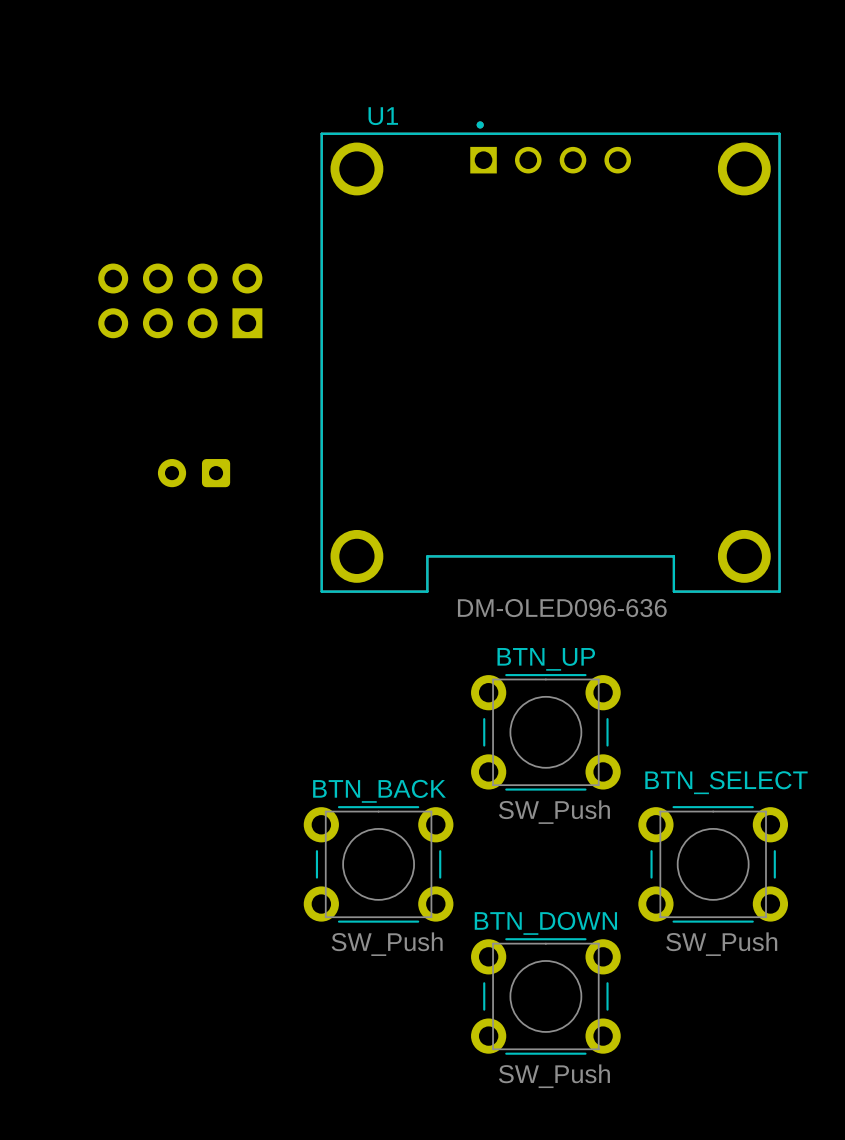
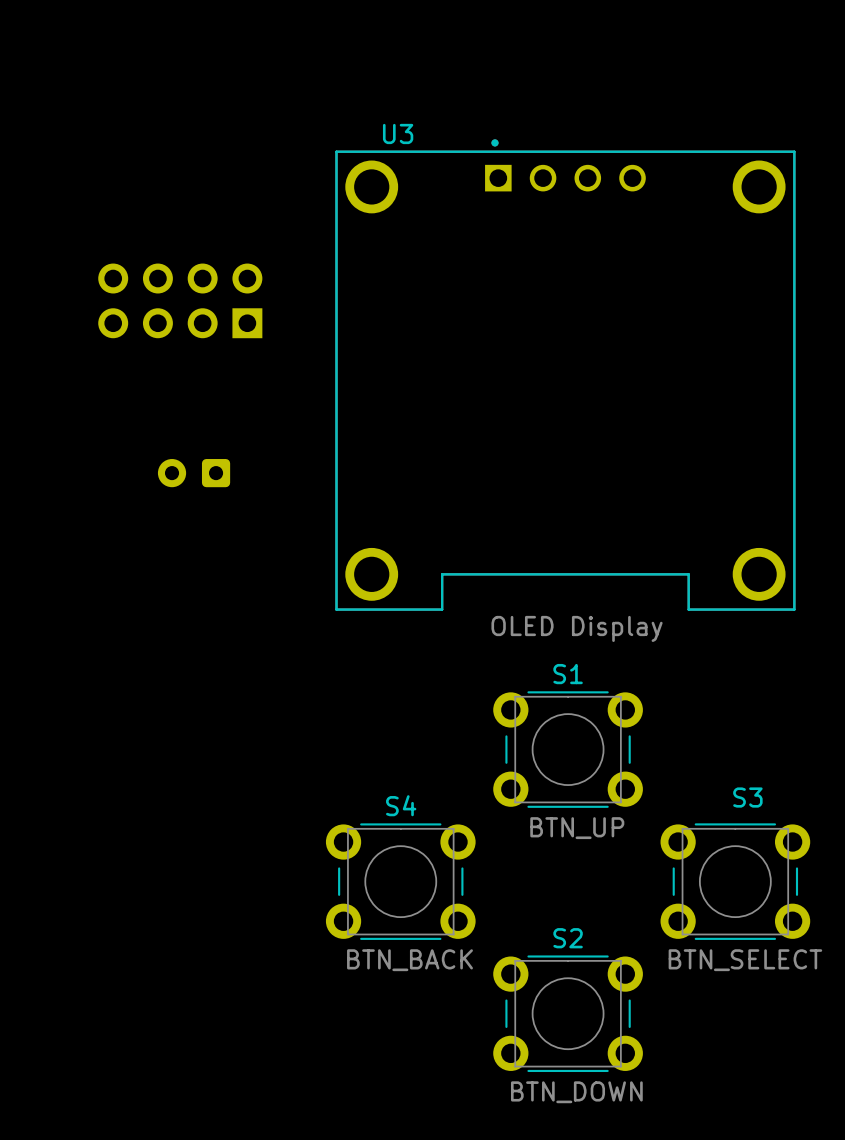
U1: DM-OLED096-636 (550, 357) -> none
U3: none -> OLED Display (565, 375)
BTN_UP: SW_Push (545, 732) -> none
S1: none -> BTN_UP (568, 749)
BTN_BACK: SW_Push (378, 864) -> none
BTN_SELECT: SW_Push (713, 864) -> none
S4: none -> BTN_BACK (400, 881)
S3: none -> BTN_SELECT (735, 881)
BTN_DOWN: SW_Push (545, 996) -> none
S2: none -> BTN_DOWN (568, 1013)

